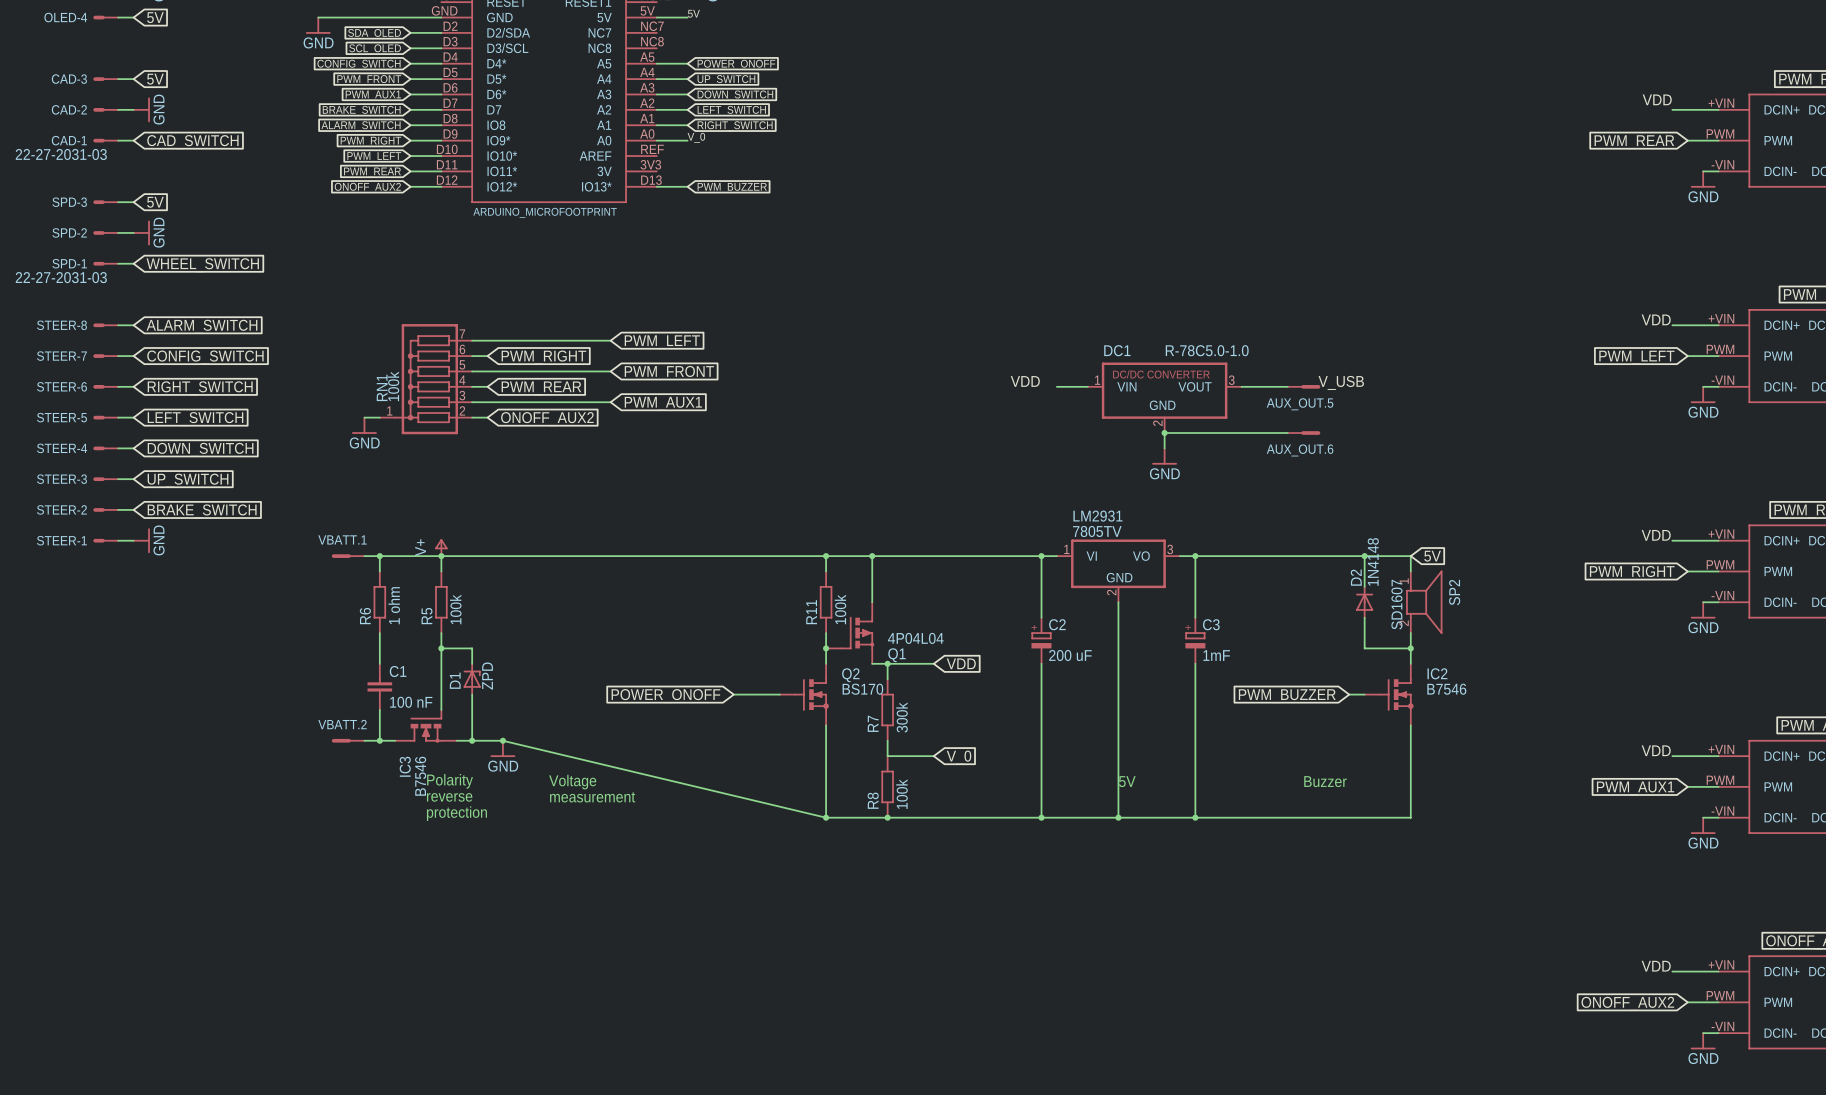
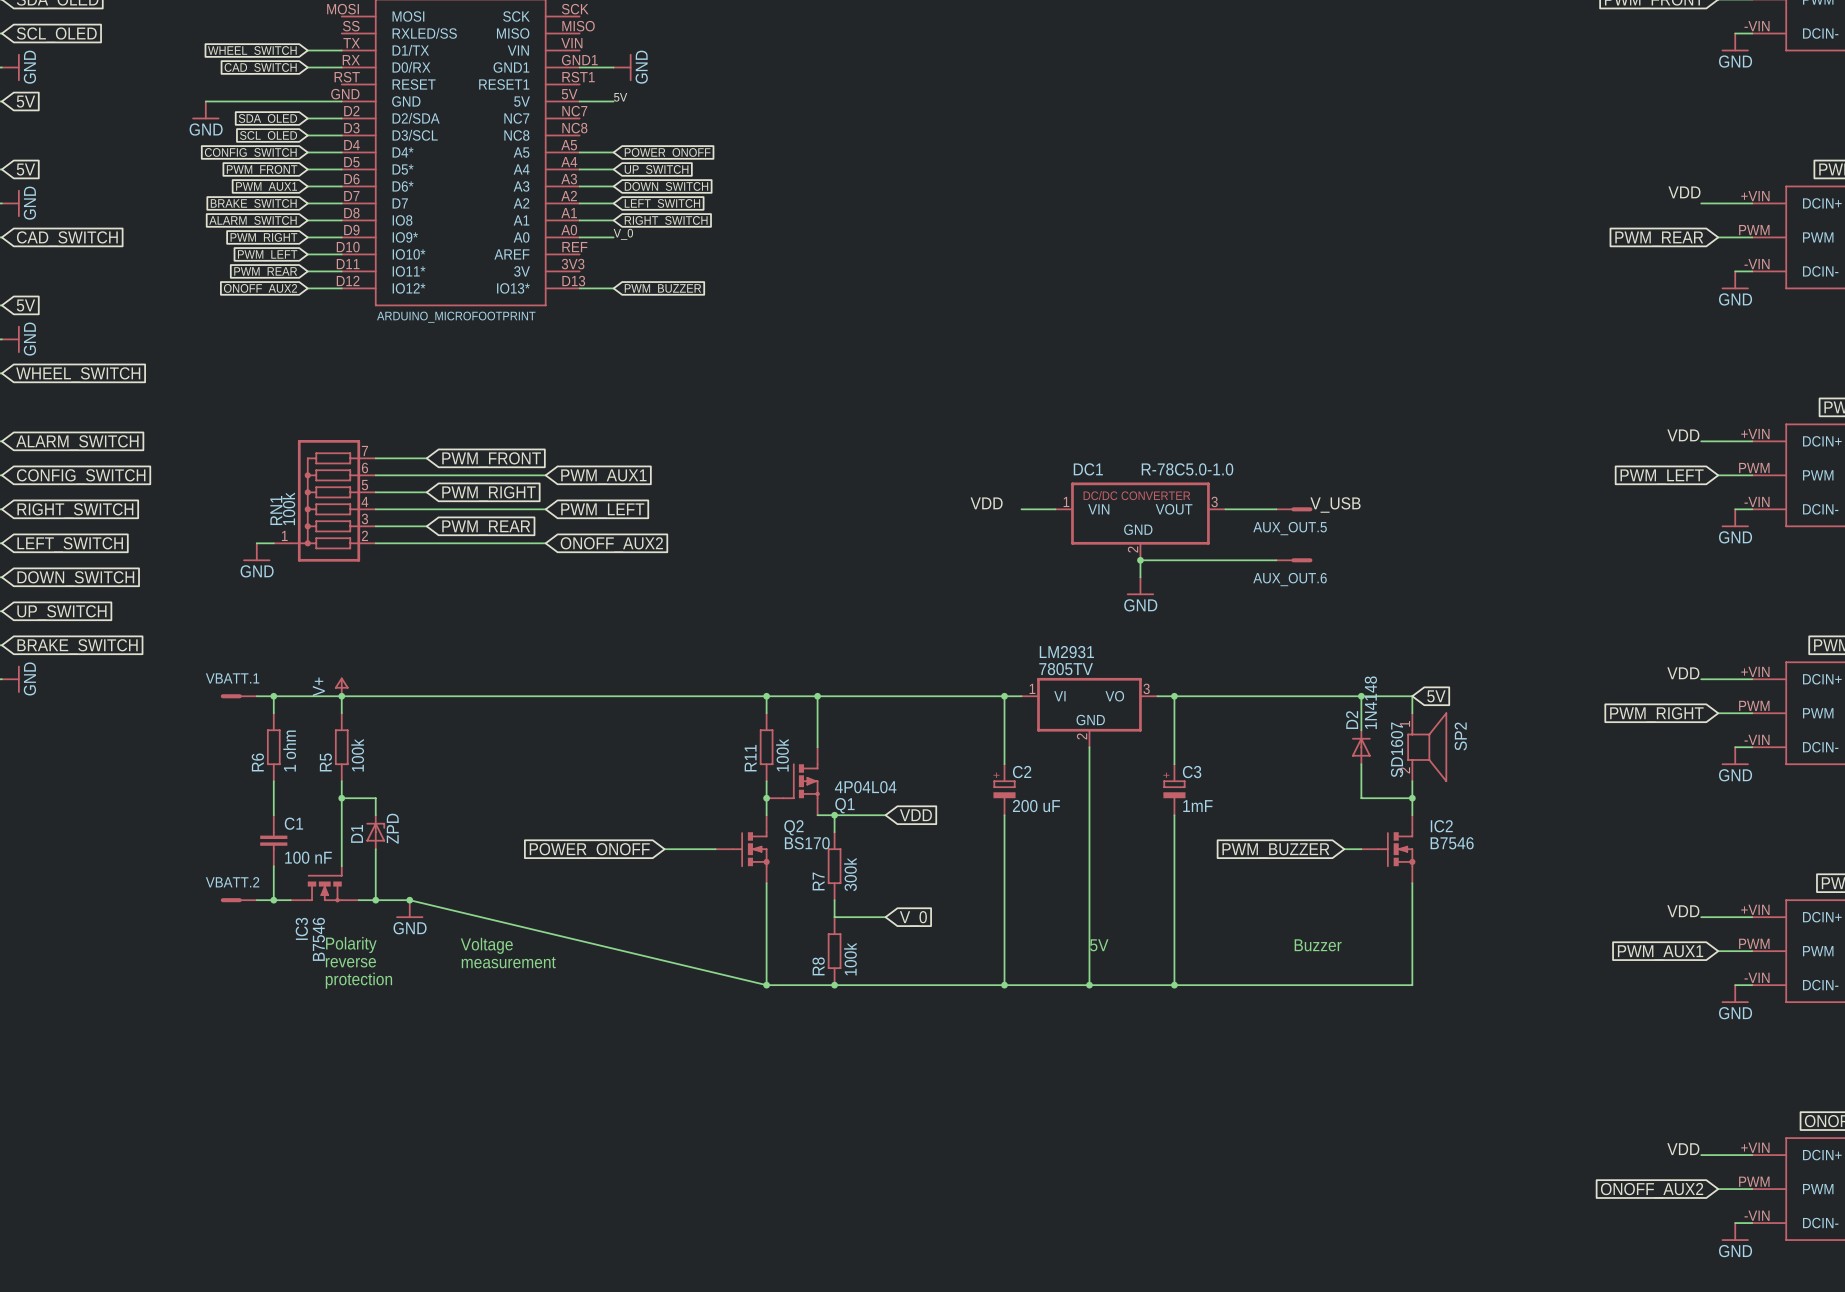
wire: (518, 340) (610, 340) -> none
global label position: PWM_LEFT (662, 342) -> PWM_LEFT (602, 511)
wire: none -> (392, 475) (545, 475)
global label position: PWM_RIGHT (543, 357) -> PWM_RIGHT (489, 493)
wire: (518, 371) (610, 371) -> none
global label position: PWM_FRONT (669, 372) -> PWM_FRONT (491, 459)
wire: none -> (392, 509) (545, 509)
global label position: PWM_REAR (541, 388) -> PWM_REAR (486, 528)
wire: (518, 402) (610, 402) -> none
global label position: PWM_AUX1 (663, 403) -> PWM_AUX1 (603, 477)
wire: none -> (392, 543) (545, 543)
global label position: ONOFF_AUX2 (547, 419) -> ONOFF_AUX2 (611, 544)

